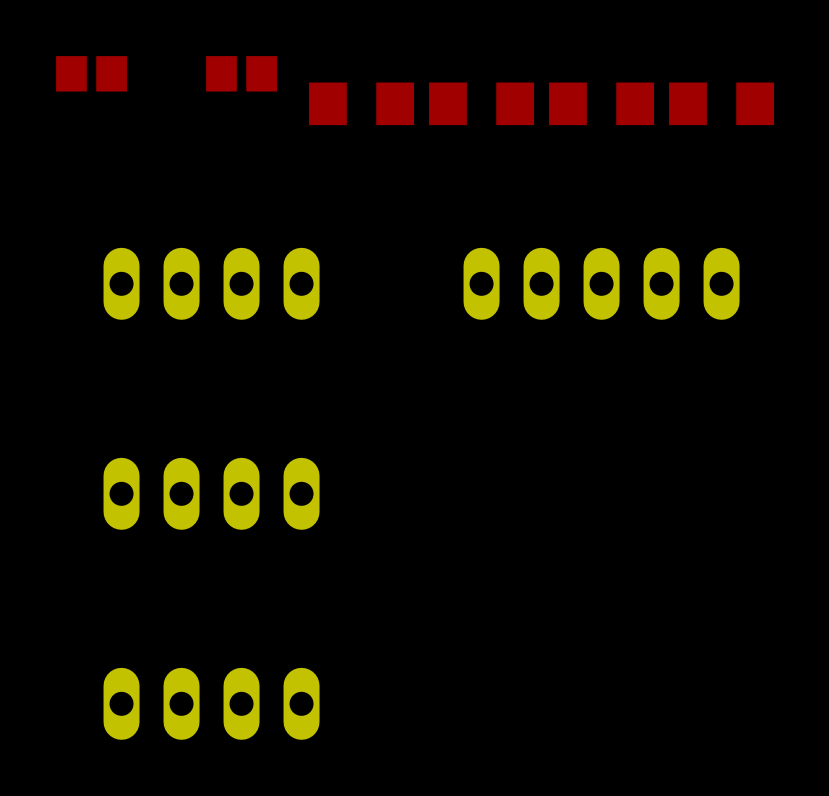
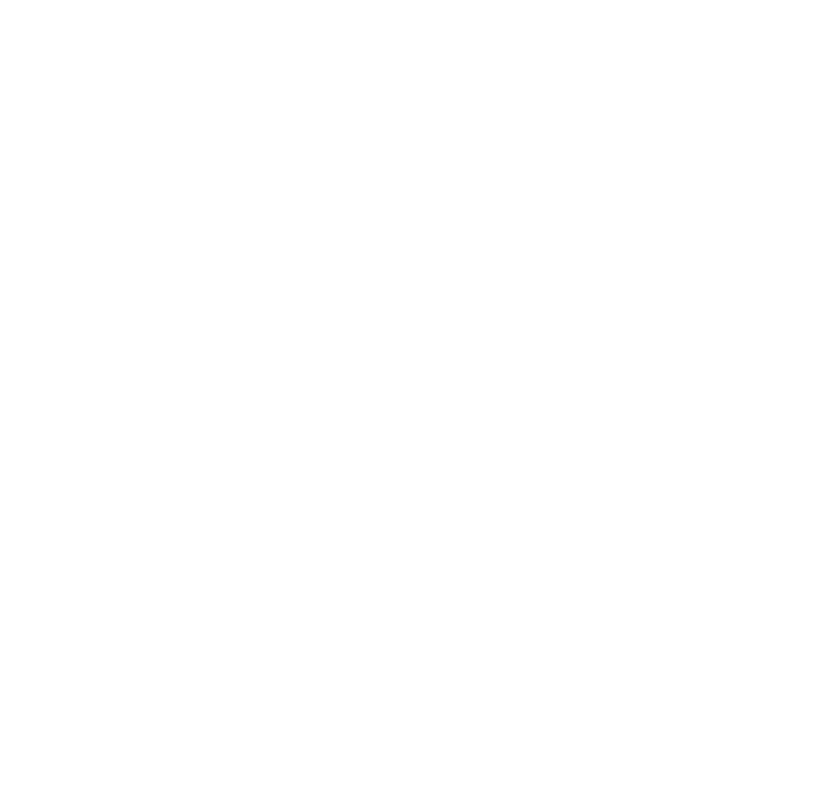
part: (91, 73) -> none
part: (241, 73) -> none
part: (361, 103) -> none
part: (481, 103) -> none
part: (601, 103) -> none
part: (721, 103) -> none
part: (211, 283) -> none
part: (601, 283) -> none
part: (211, 493) -> none
part: (211, 703) -> none

